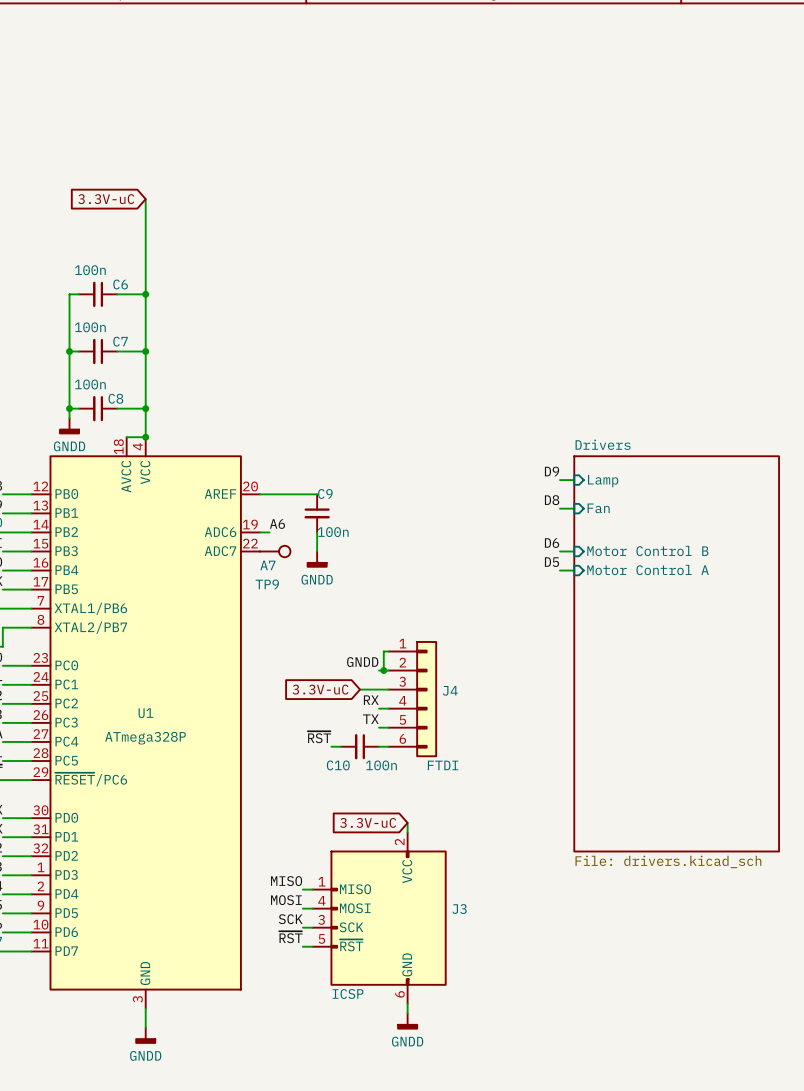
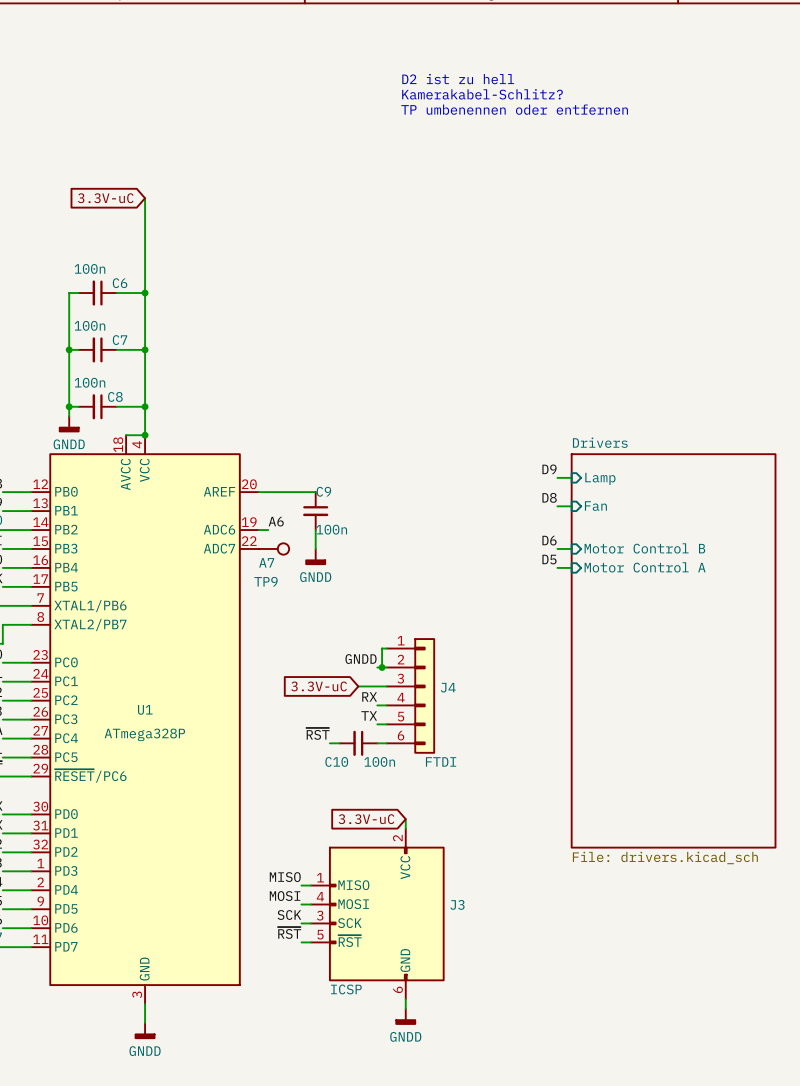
text: none -> D2 ist zu hell (458, 79)
text: none -> Kamerakabel-Schlitz? (482, 94)
text: none -> TP umbenennen oder entfernen (514, 109)

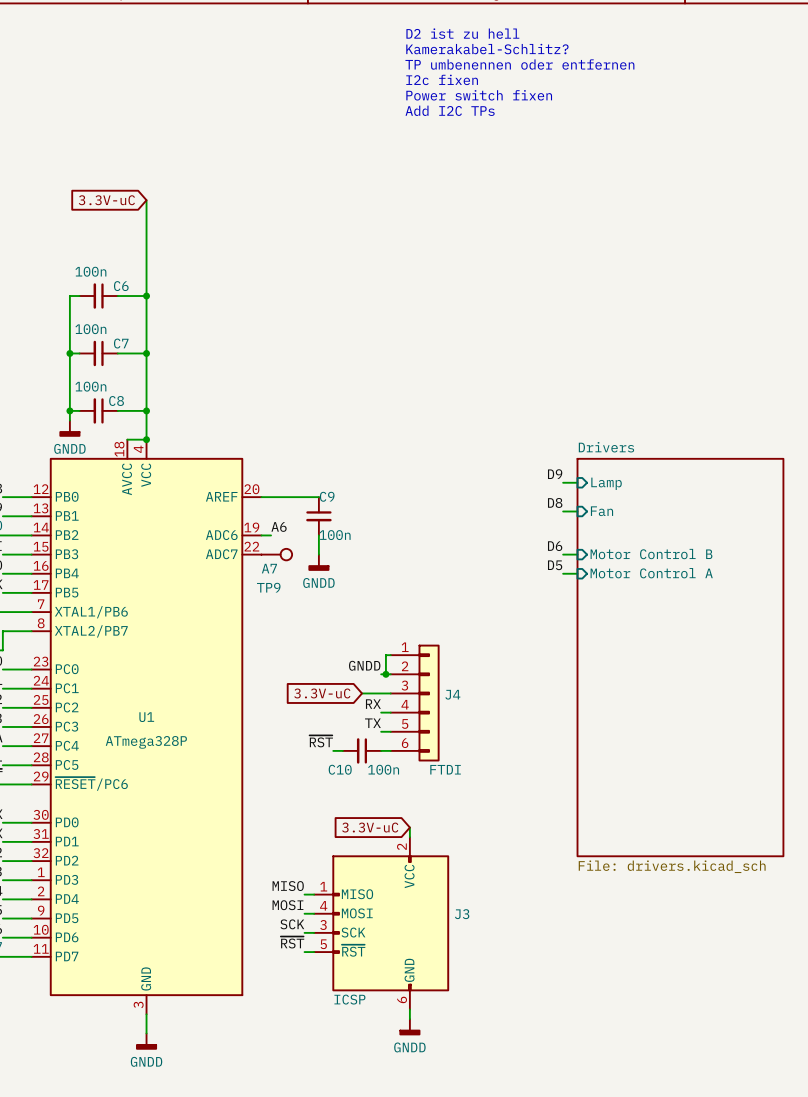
text: none -> D2 ist zu hell (462, 33)
text: none -> Kamerakabel-Schlitz? (487, 49)
text: none -> TP umbenennen oder entfernen (519, 64)
text: D2 ist zu hell (458, 79) -> I2c fixen (442, 79)
text: Kamerakabel-Schlitz? (482, 94) -> Power switch fixen (479, 95)
text: TP umbenennen oder entfernen (514, 109) -> Add I2C TPs (450, 110)

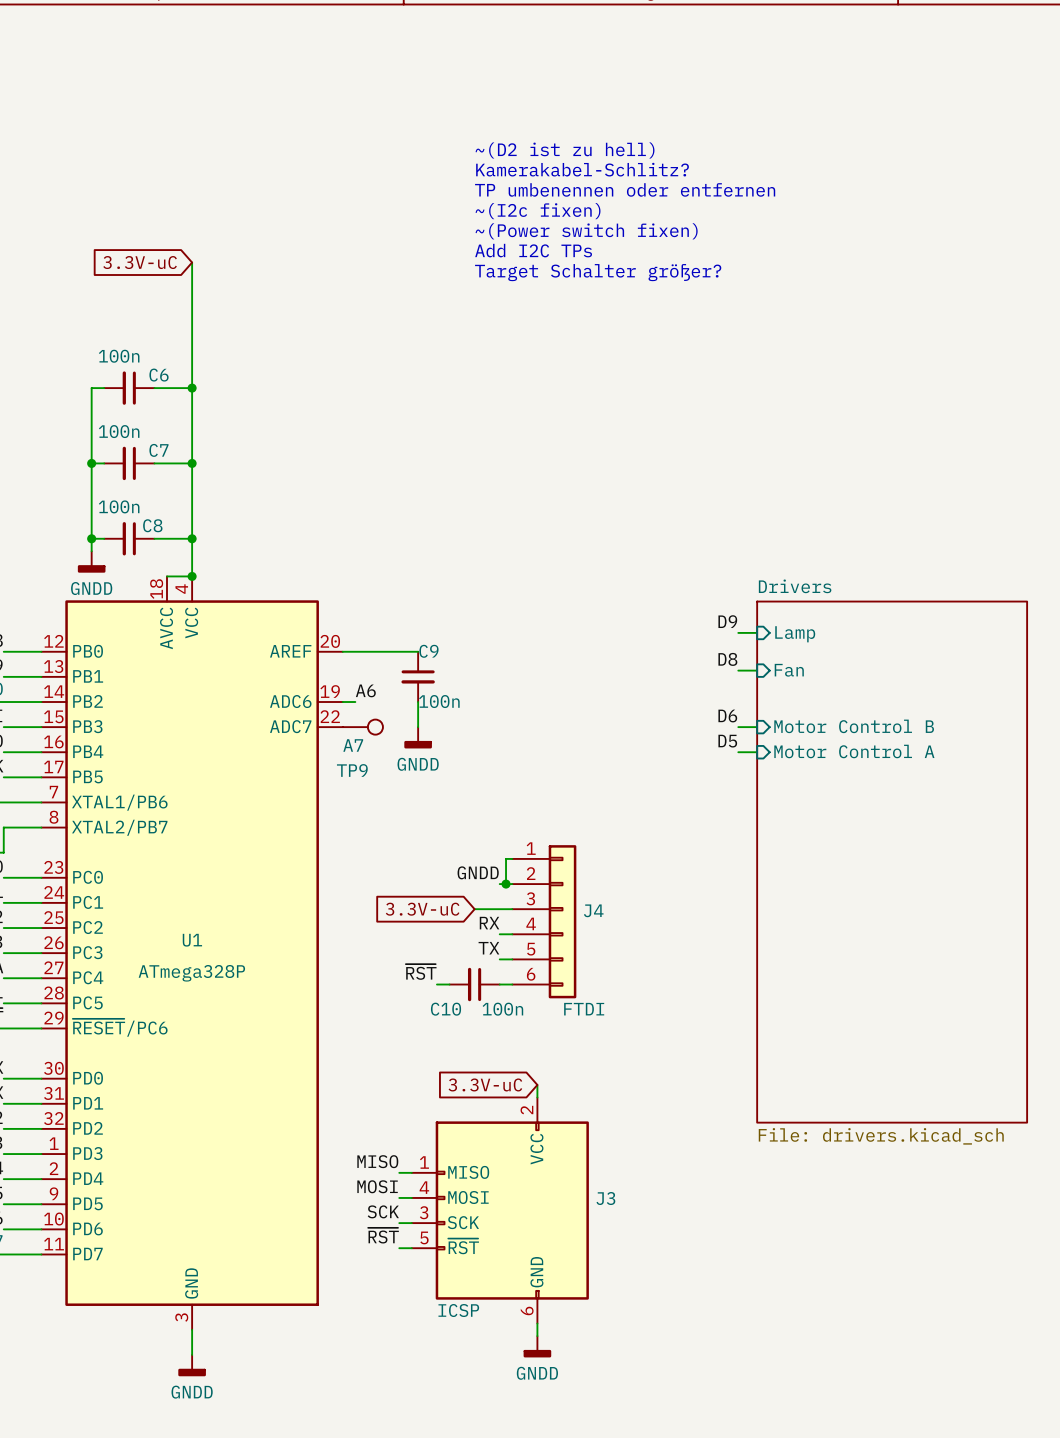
text: D2 ist zu hell (462, 33) -> none
text position: Kamerakabel-Schlitz? (487, 49) -> Kamerakabel-Schlitz? (582, 169)
text position: TP umbenennen oder entfernen (519, 64) -> TP umbenennen oder entfernen (625, 189)
text: I2c fixen (442, 79) -> none
text: Power switch fixen (479, 95) -> none
text position: Add I2C TPs (450, 110) -> Add I2C TPs (533, 250)
text: none -> ~(D2 ist zu hell) (565, 150)
text: none -> ~(I2c fixen) (538, 211)
text: none -> ~(Power switch fixen) (586, 231)
text: none -> Target Schalter größer? (598, 272)

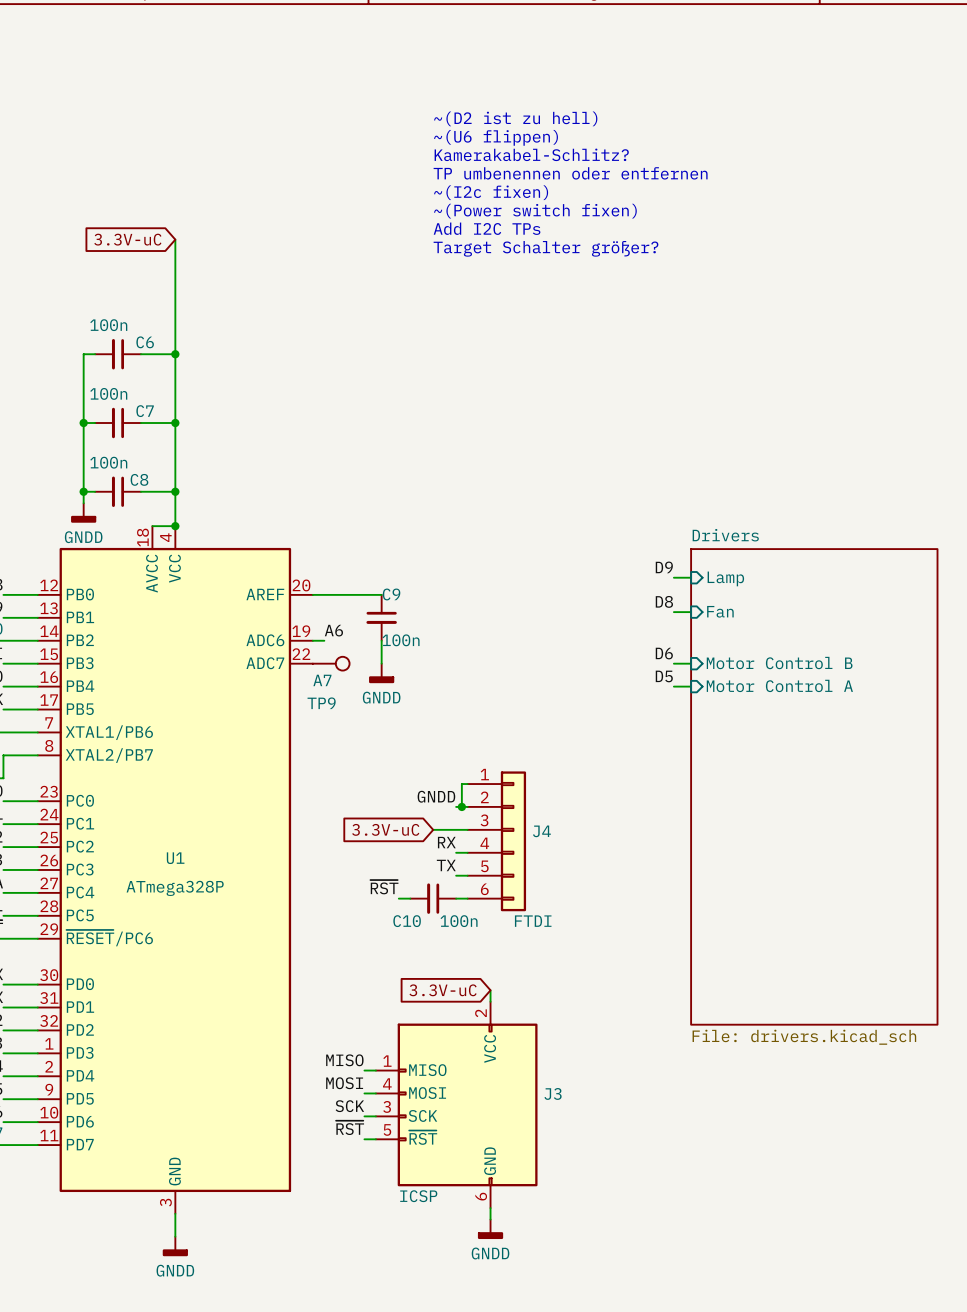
text: none -> ~(D2 ist zu hell) (515, 118)
text: ~(D2 ist zu hell) (565, 150) -> ~(U6 flippen) (496, 137)

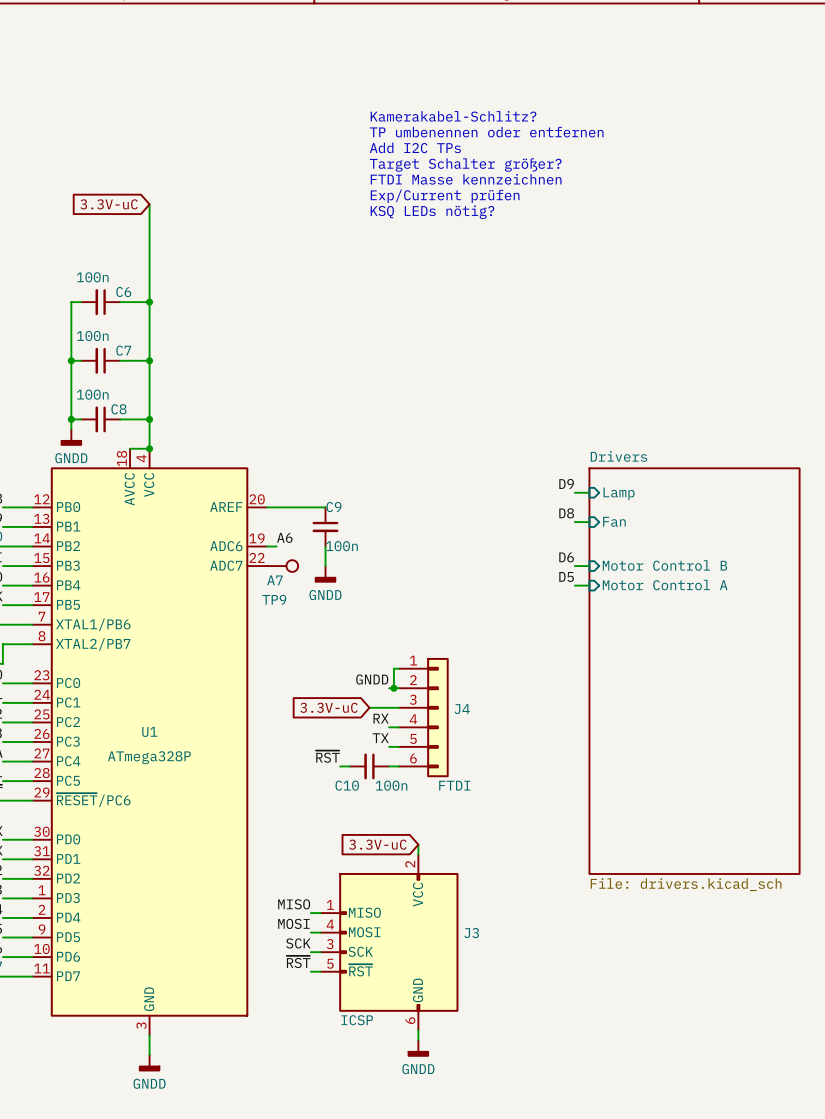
text: ~(D2 ist zu hell) (515, 118) -> none
text: ~(U6 flippen) (496, 137) -> Kamerakabel-Schlitz? (453, 116)
text: Kamerakabel-Schlitz? (531, 154) -> TP umbenennen oder entfernen (486, 132)
text: TP umbenennen oder entfernen (570, 173) -> Add I2C TPs (415, 147)
text: ~(I2c fixen) (491, 192) -> Target Schalter größer? (465, 165)
text: ~(Power switch fixen) (535, 211) -> FTDI Masse kennzeichnen (466, 179)
text: Add I2C TPs (487, 228) -> Exp/Current prüfen (445, 196)
text: Target Schalter größer? (545, 248) -> KSQ LEDs nötig? (432, 212)

